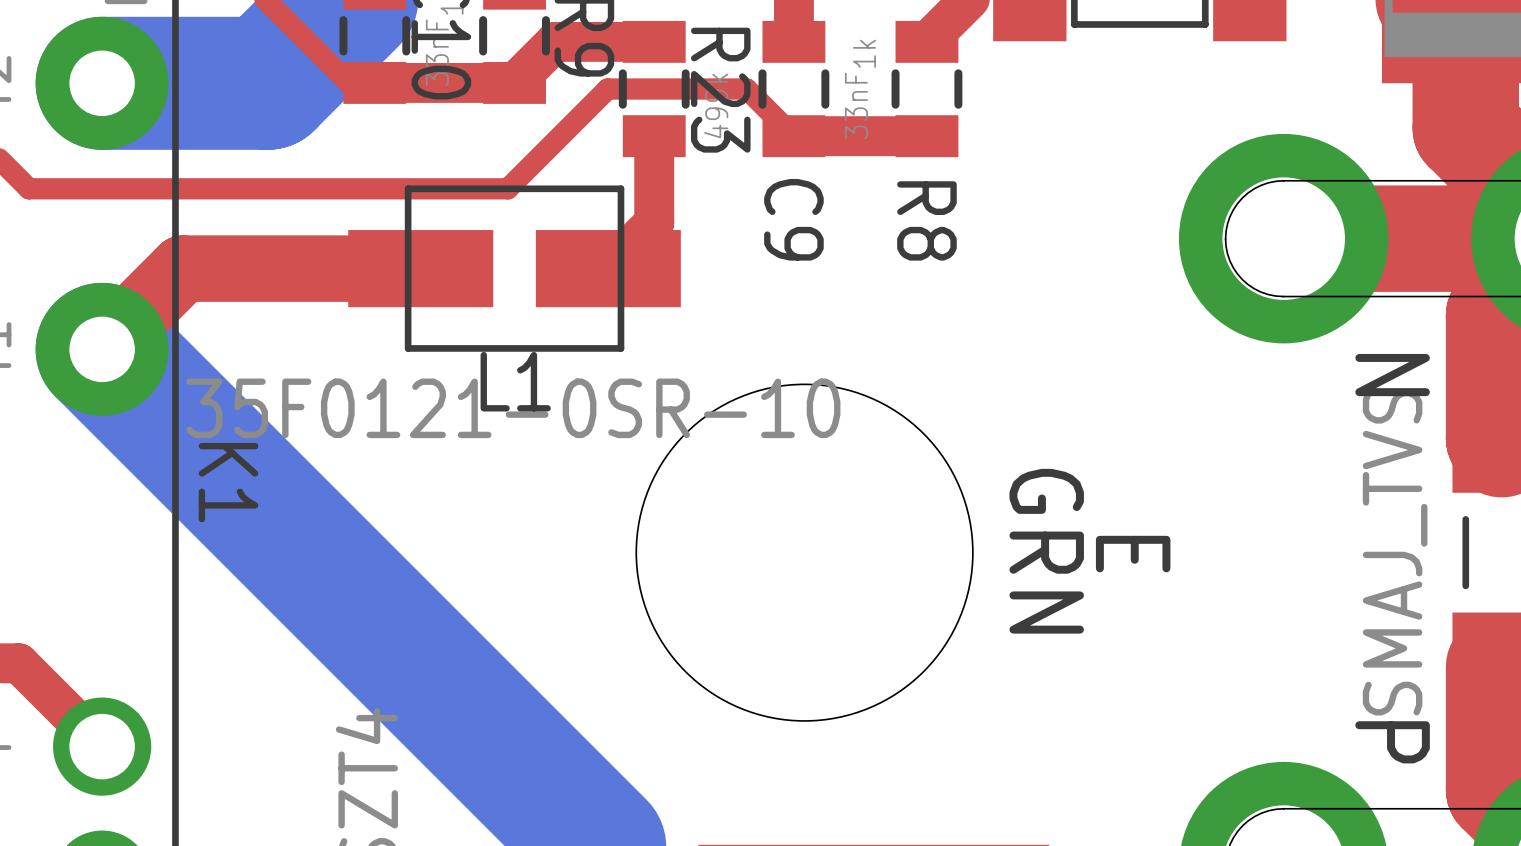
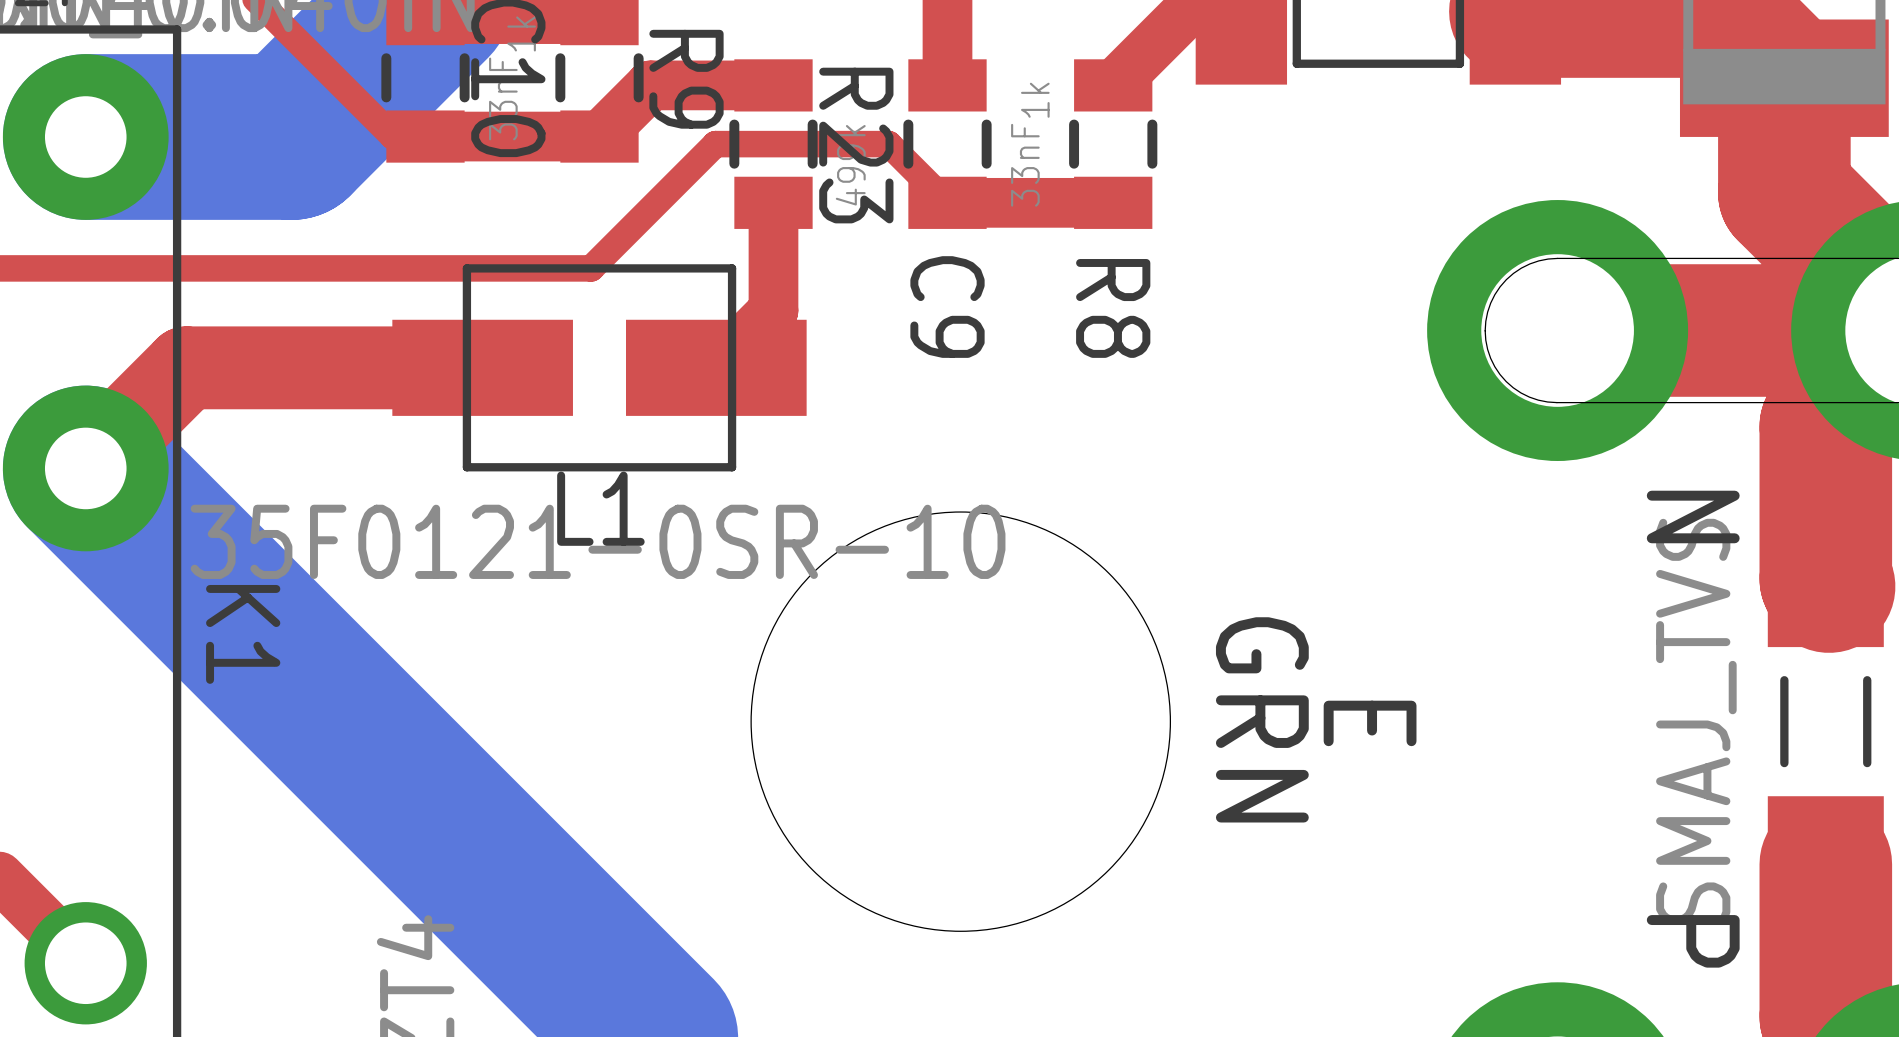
text position: N (1392, 375) -> N (1693, 516)
text position: P (1392, 742) -> P (1693, 941)

